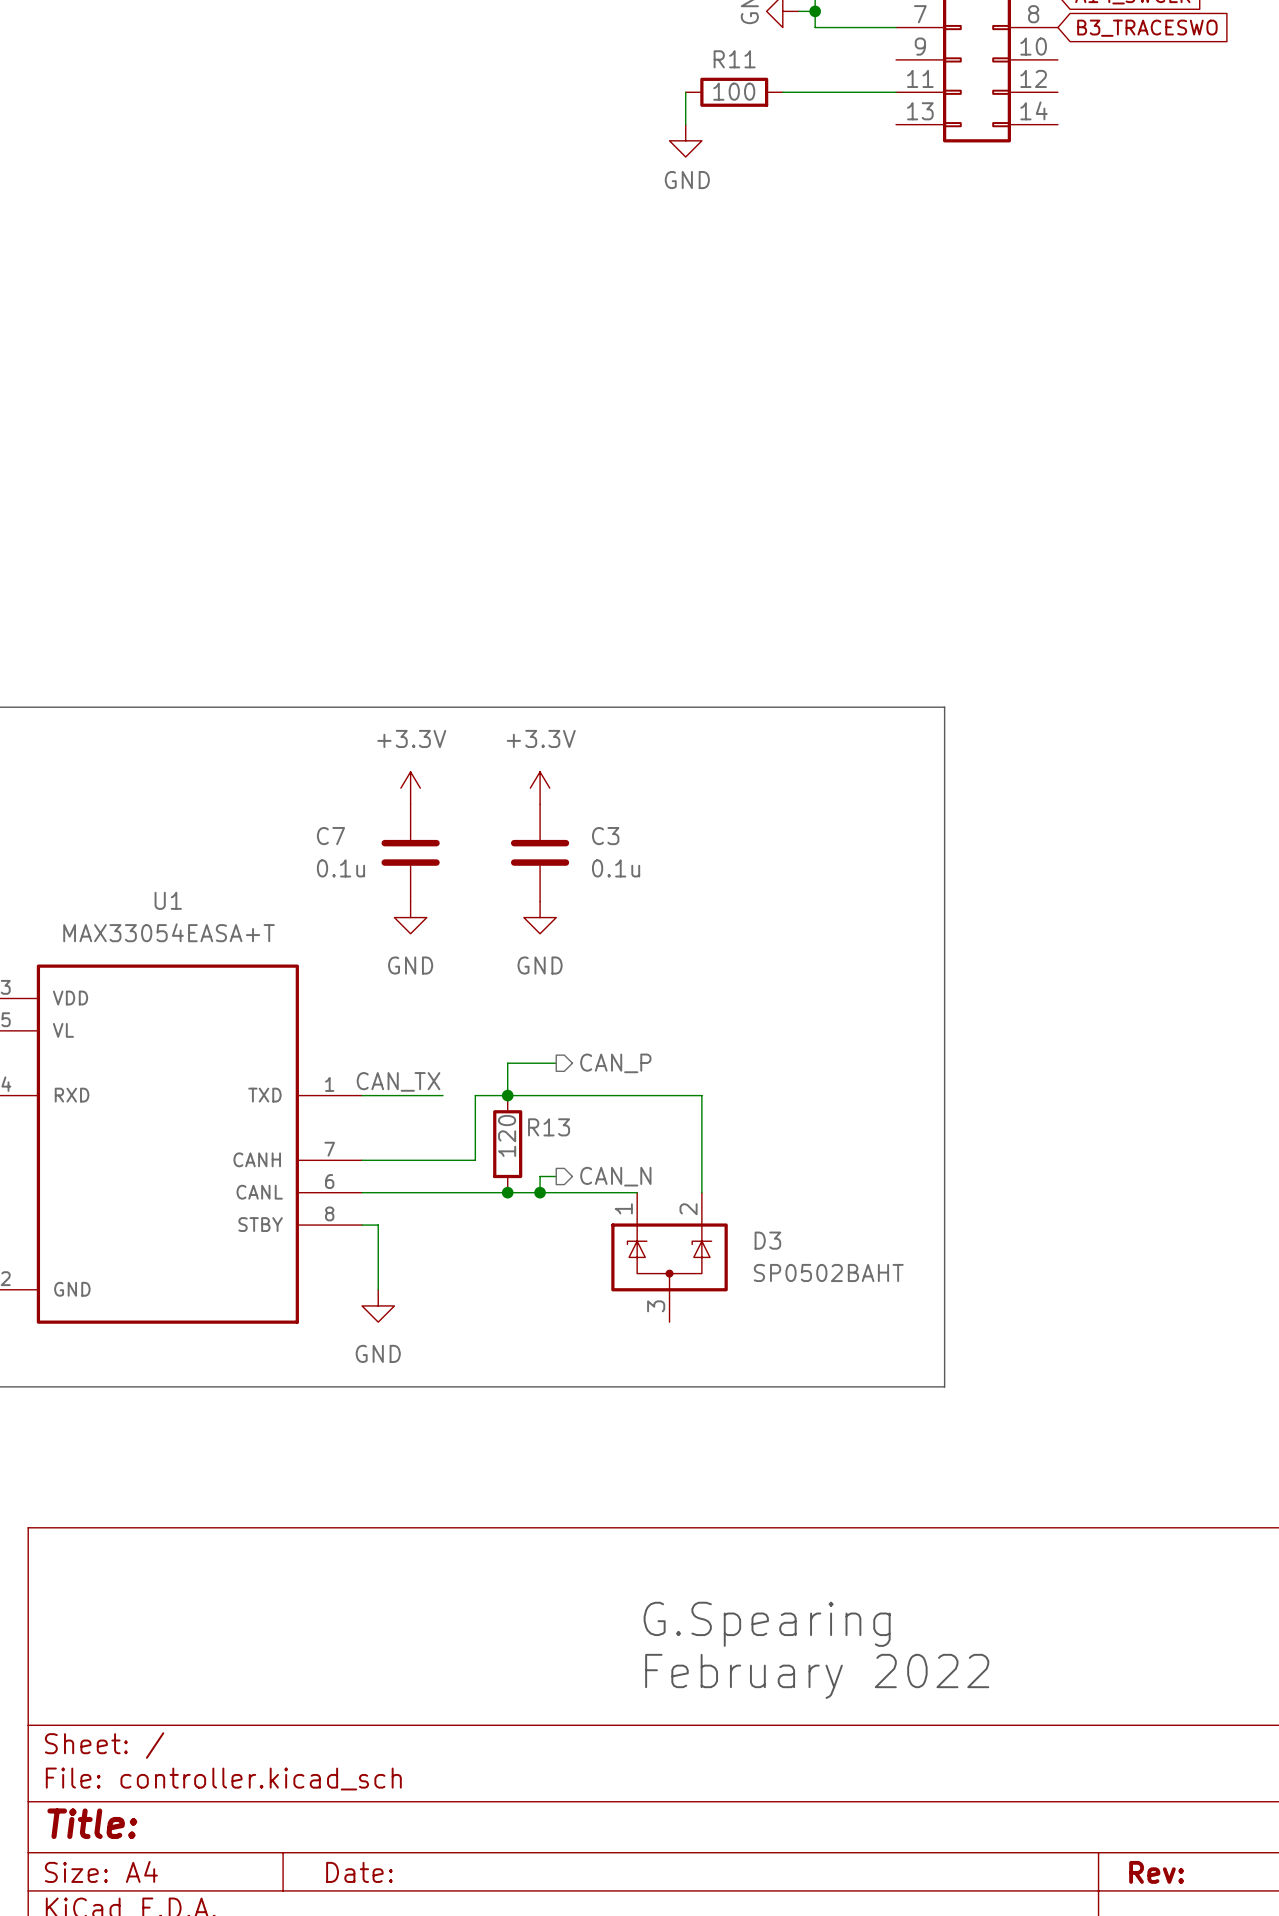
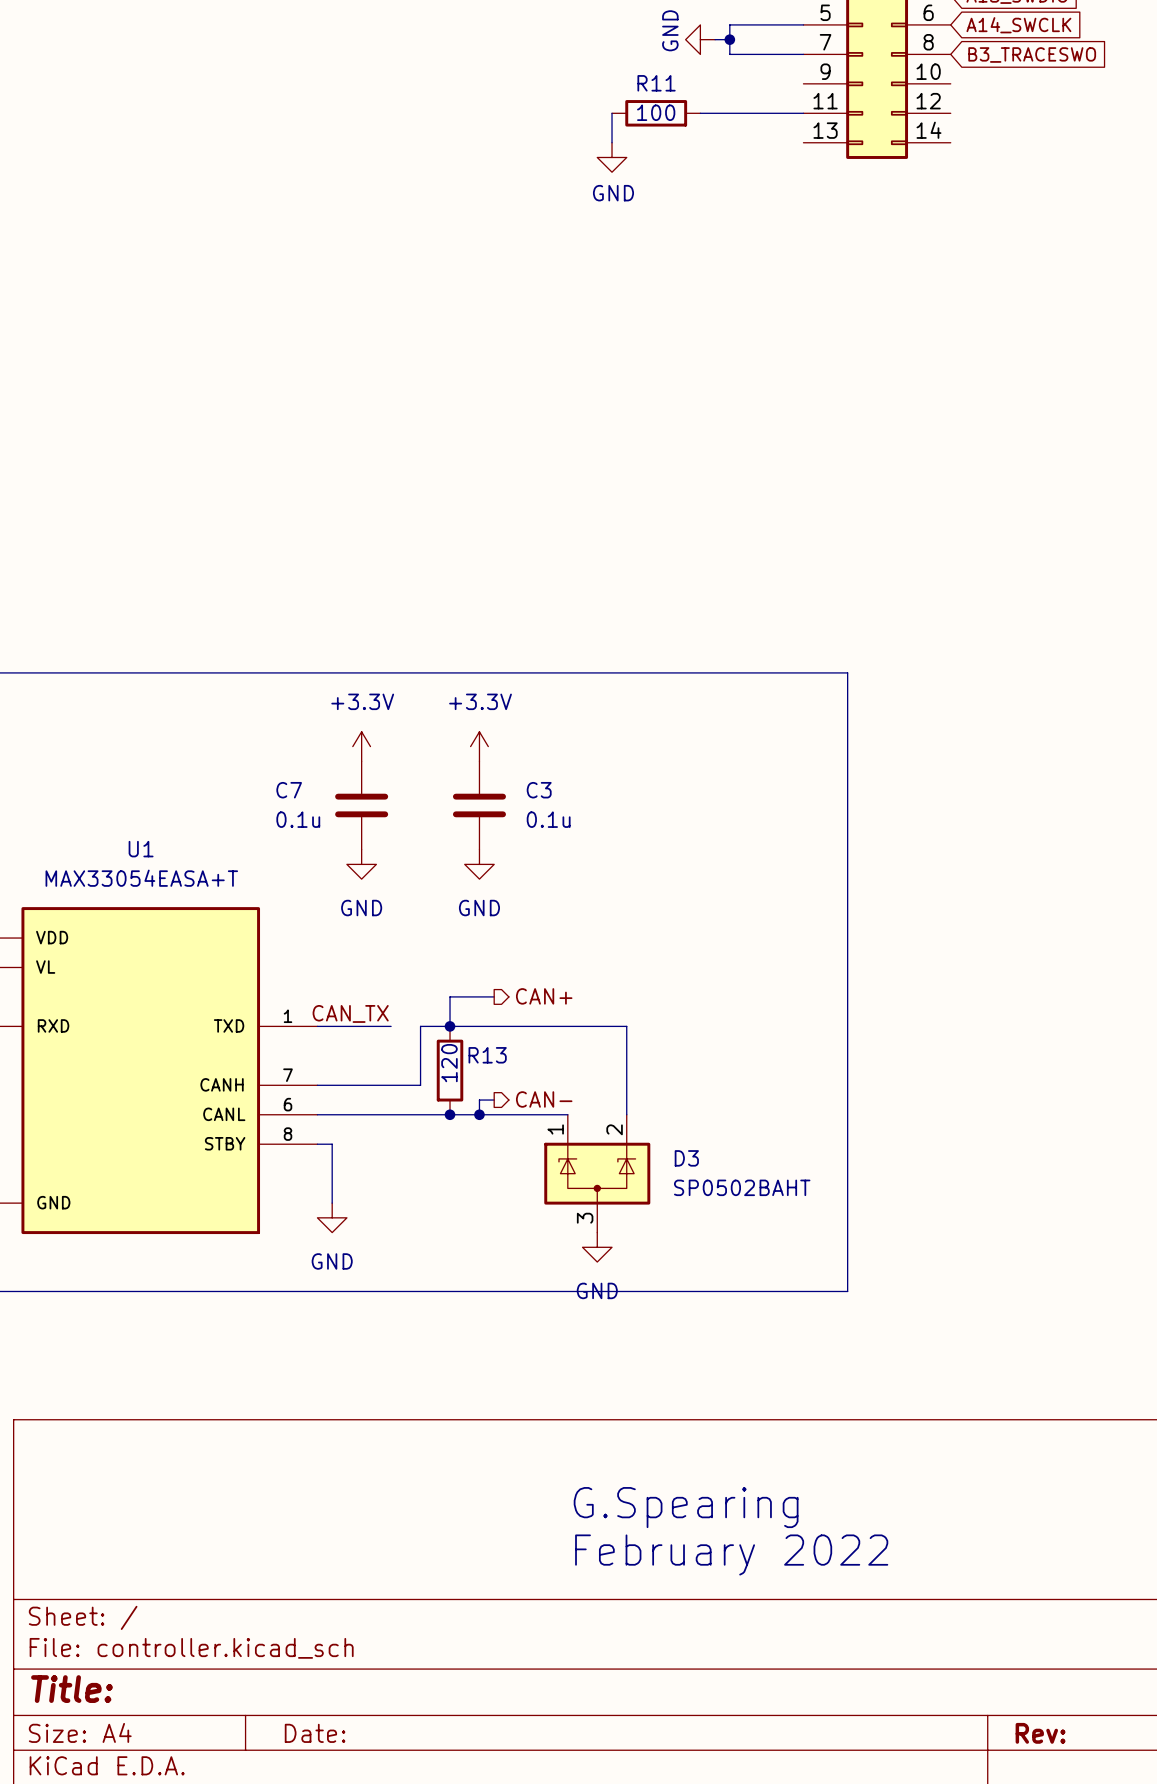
hierarchical label: CAN_P (615, 1063) -> CAN+ (544, 996)
hierarchical label: CAN_N (615, 1176) -> CAN- (544, 1099)
power symbol: none -> GND (597, 1247)

